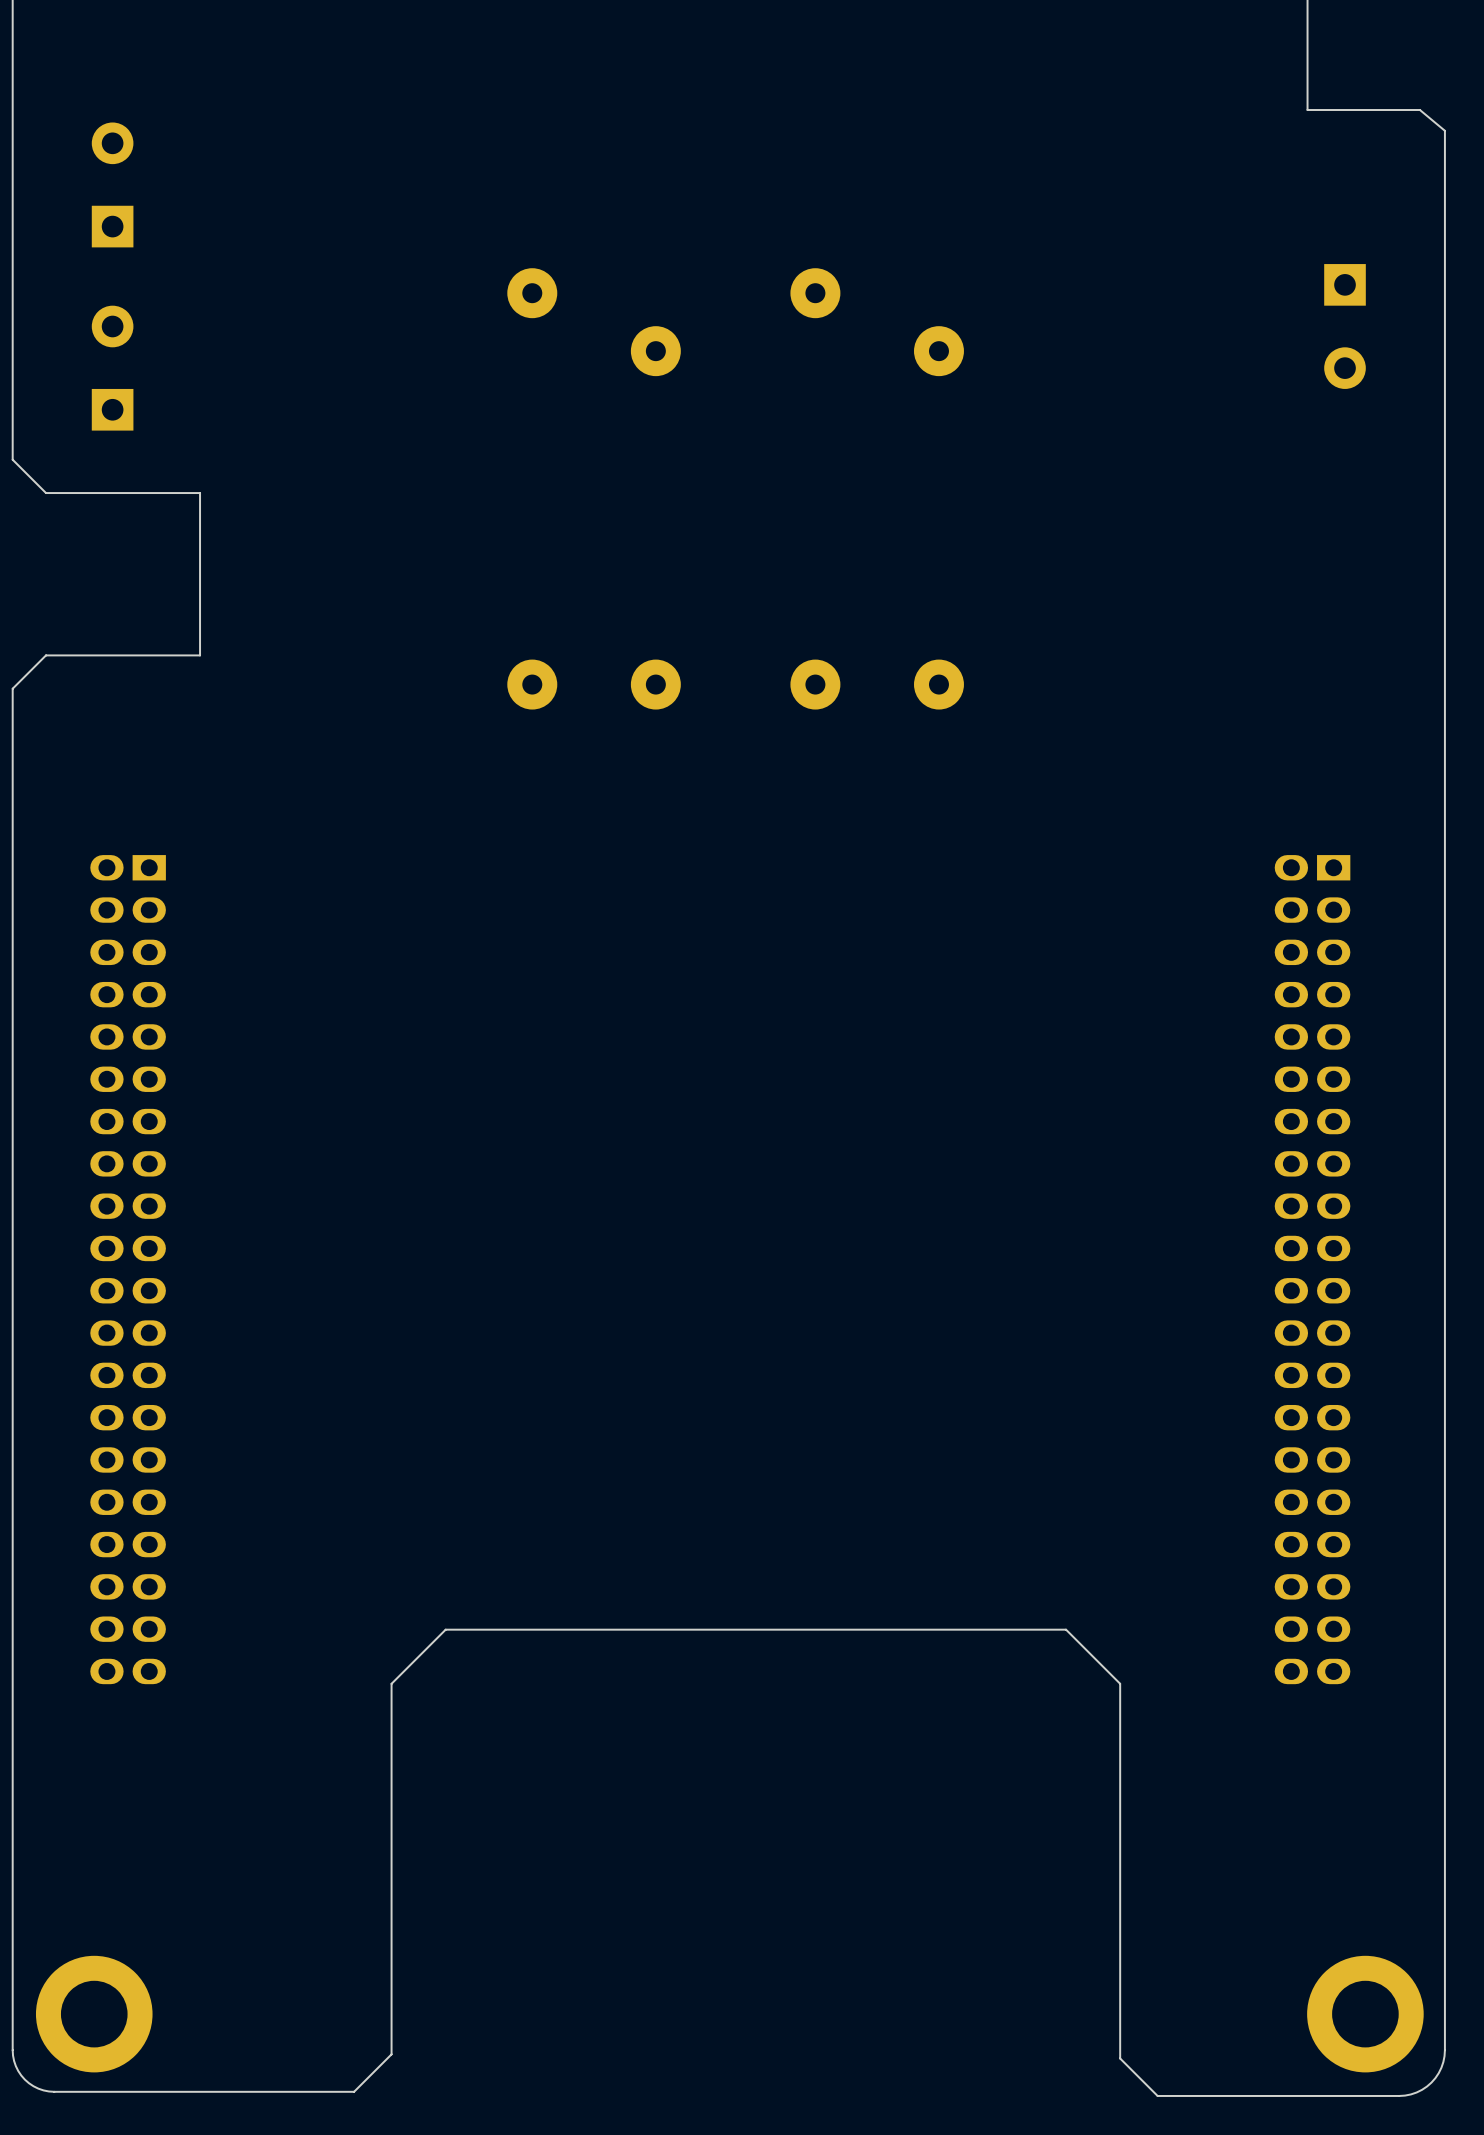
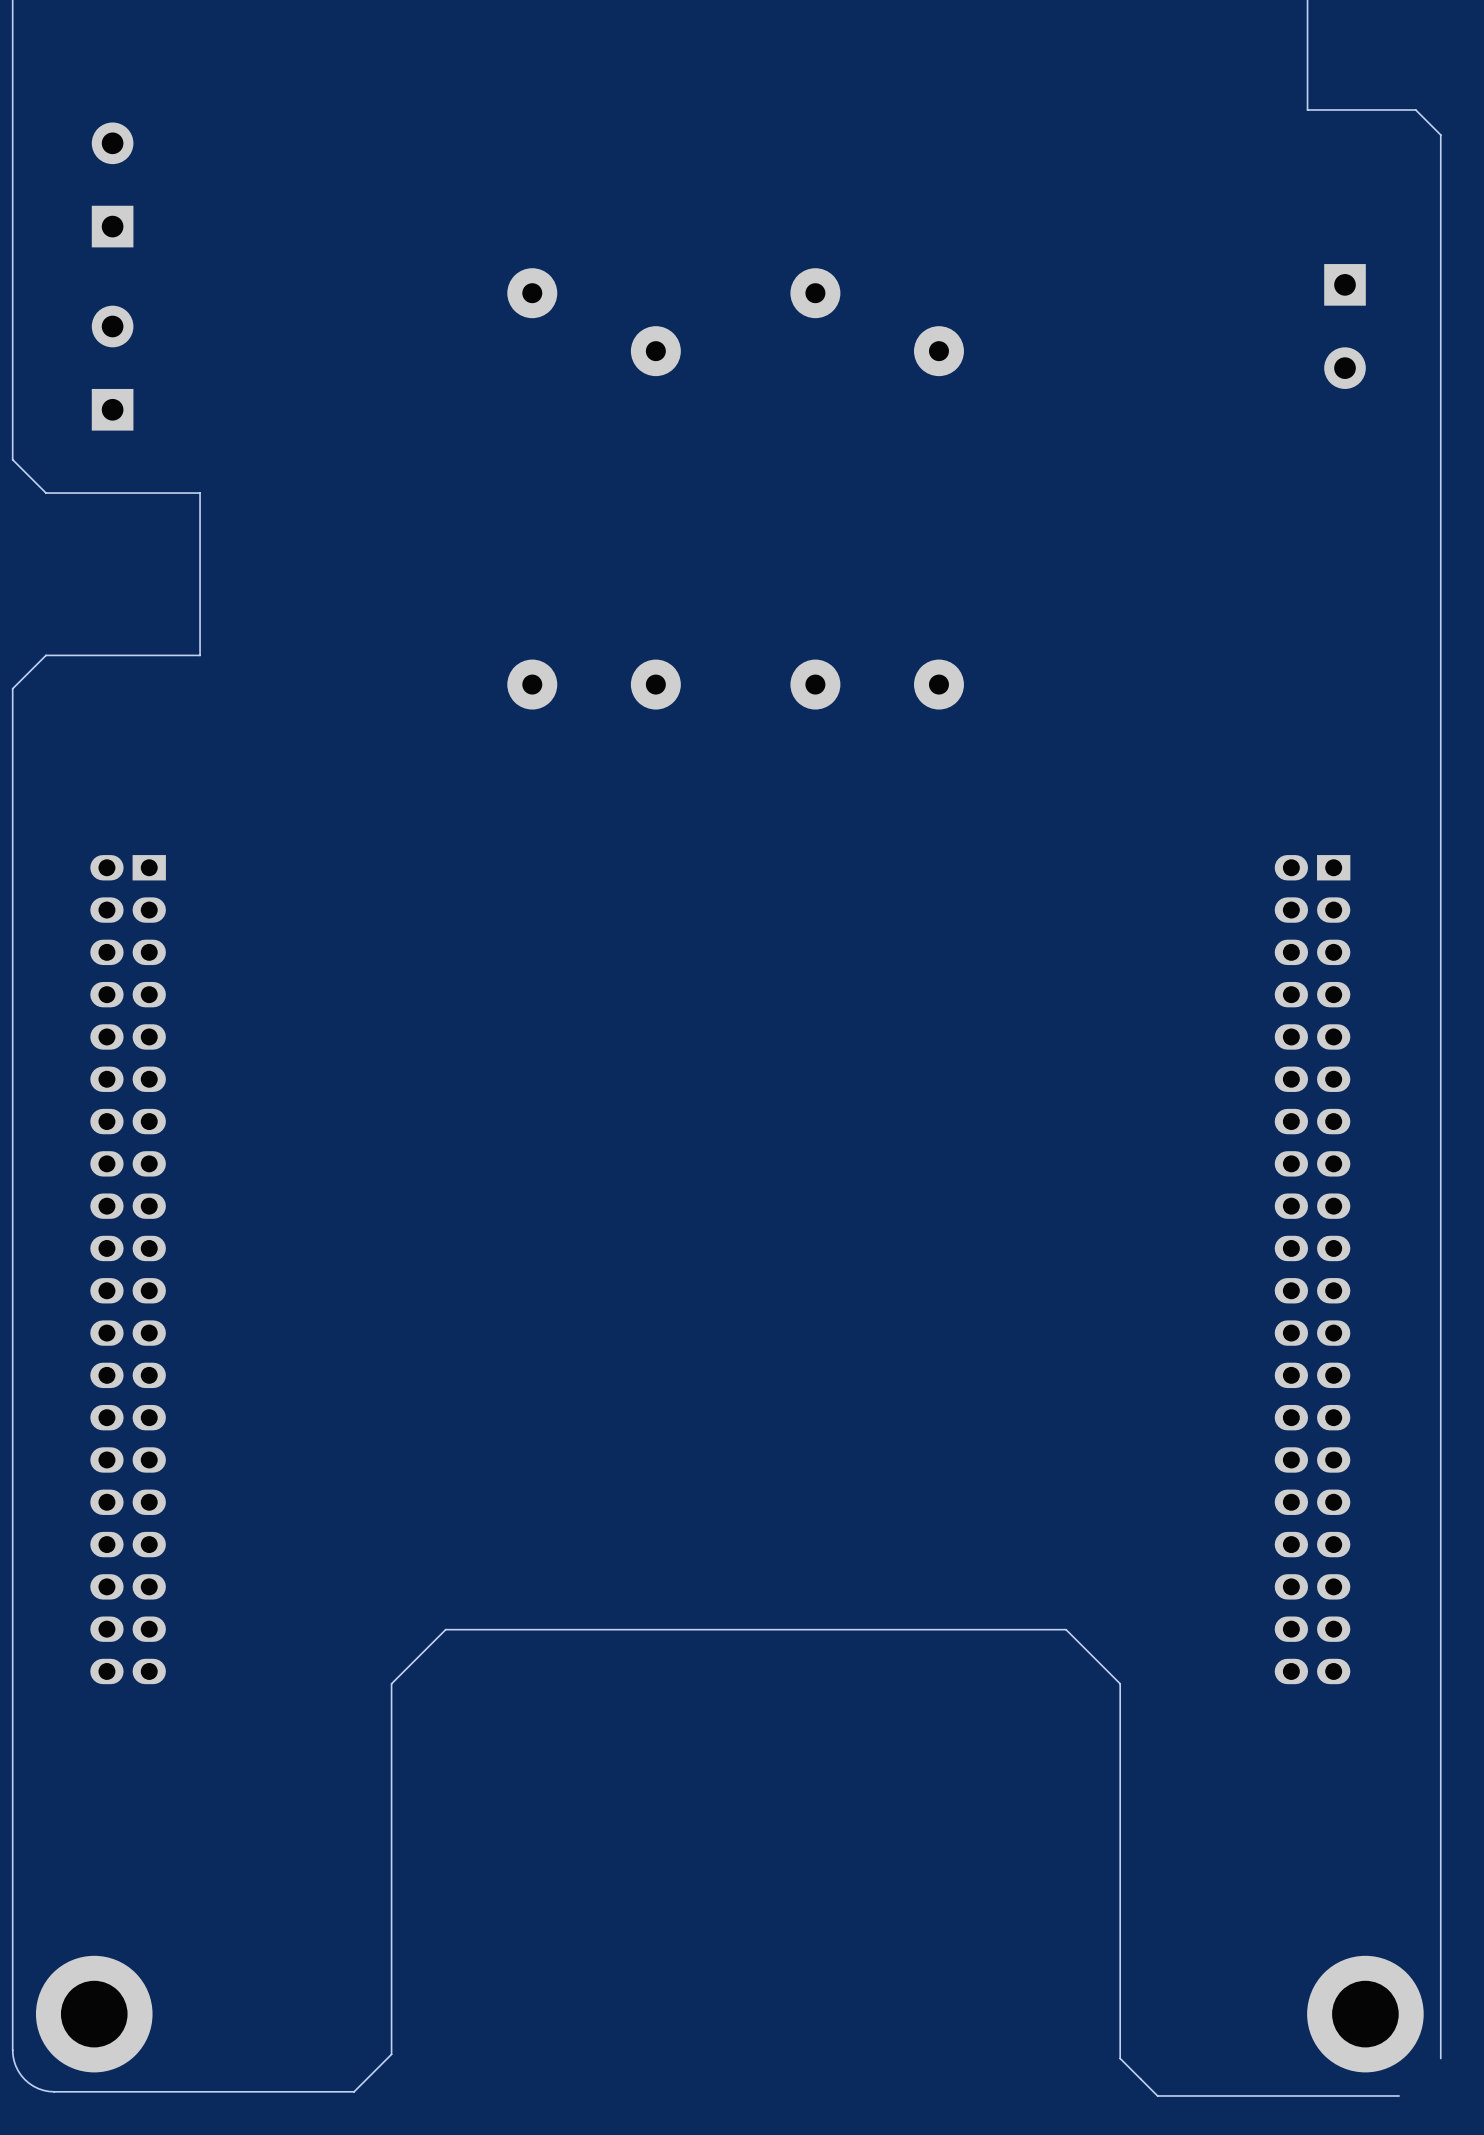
board edge: (1415, 110) (1419, 110) (1444, 130) (1444, 2050) (1441, 2067) (1431, 2082) (1416, 2092) (1399, 2095) -> (1415, 110) (1440, 134) (1440, 2058)

